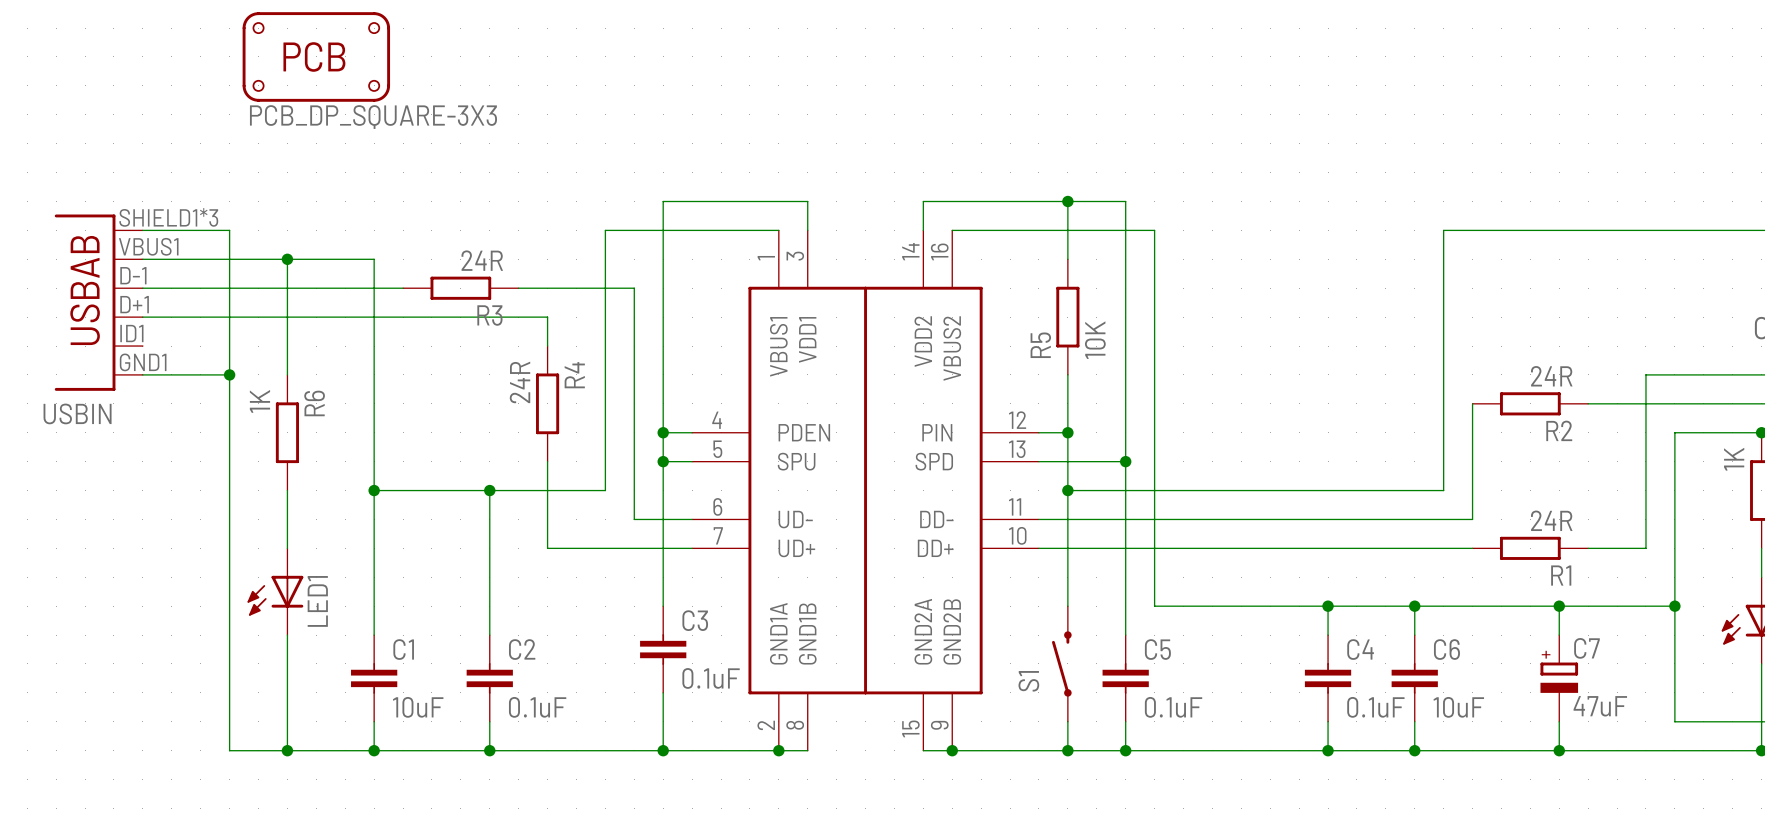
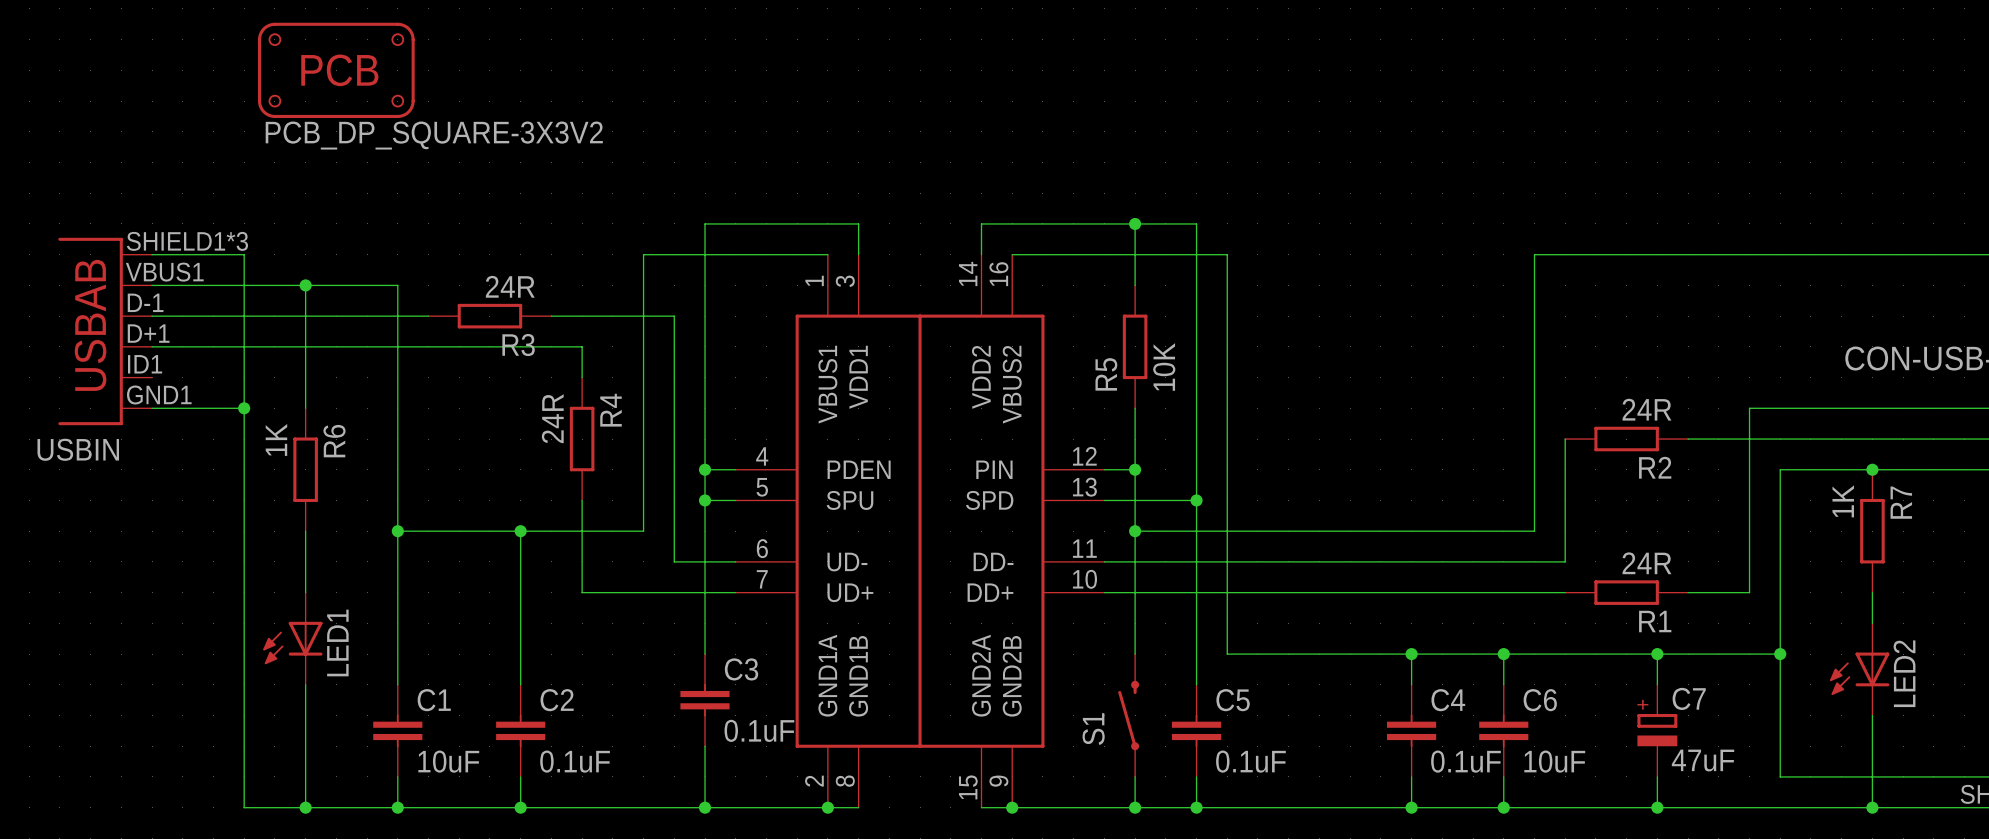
part value: PCB_DP_SQUARE-3X3 (373, 117) -> PCB_DP_SQUARE-3X3V2 (434, 135)

